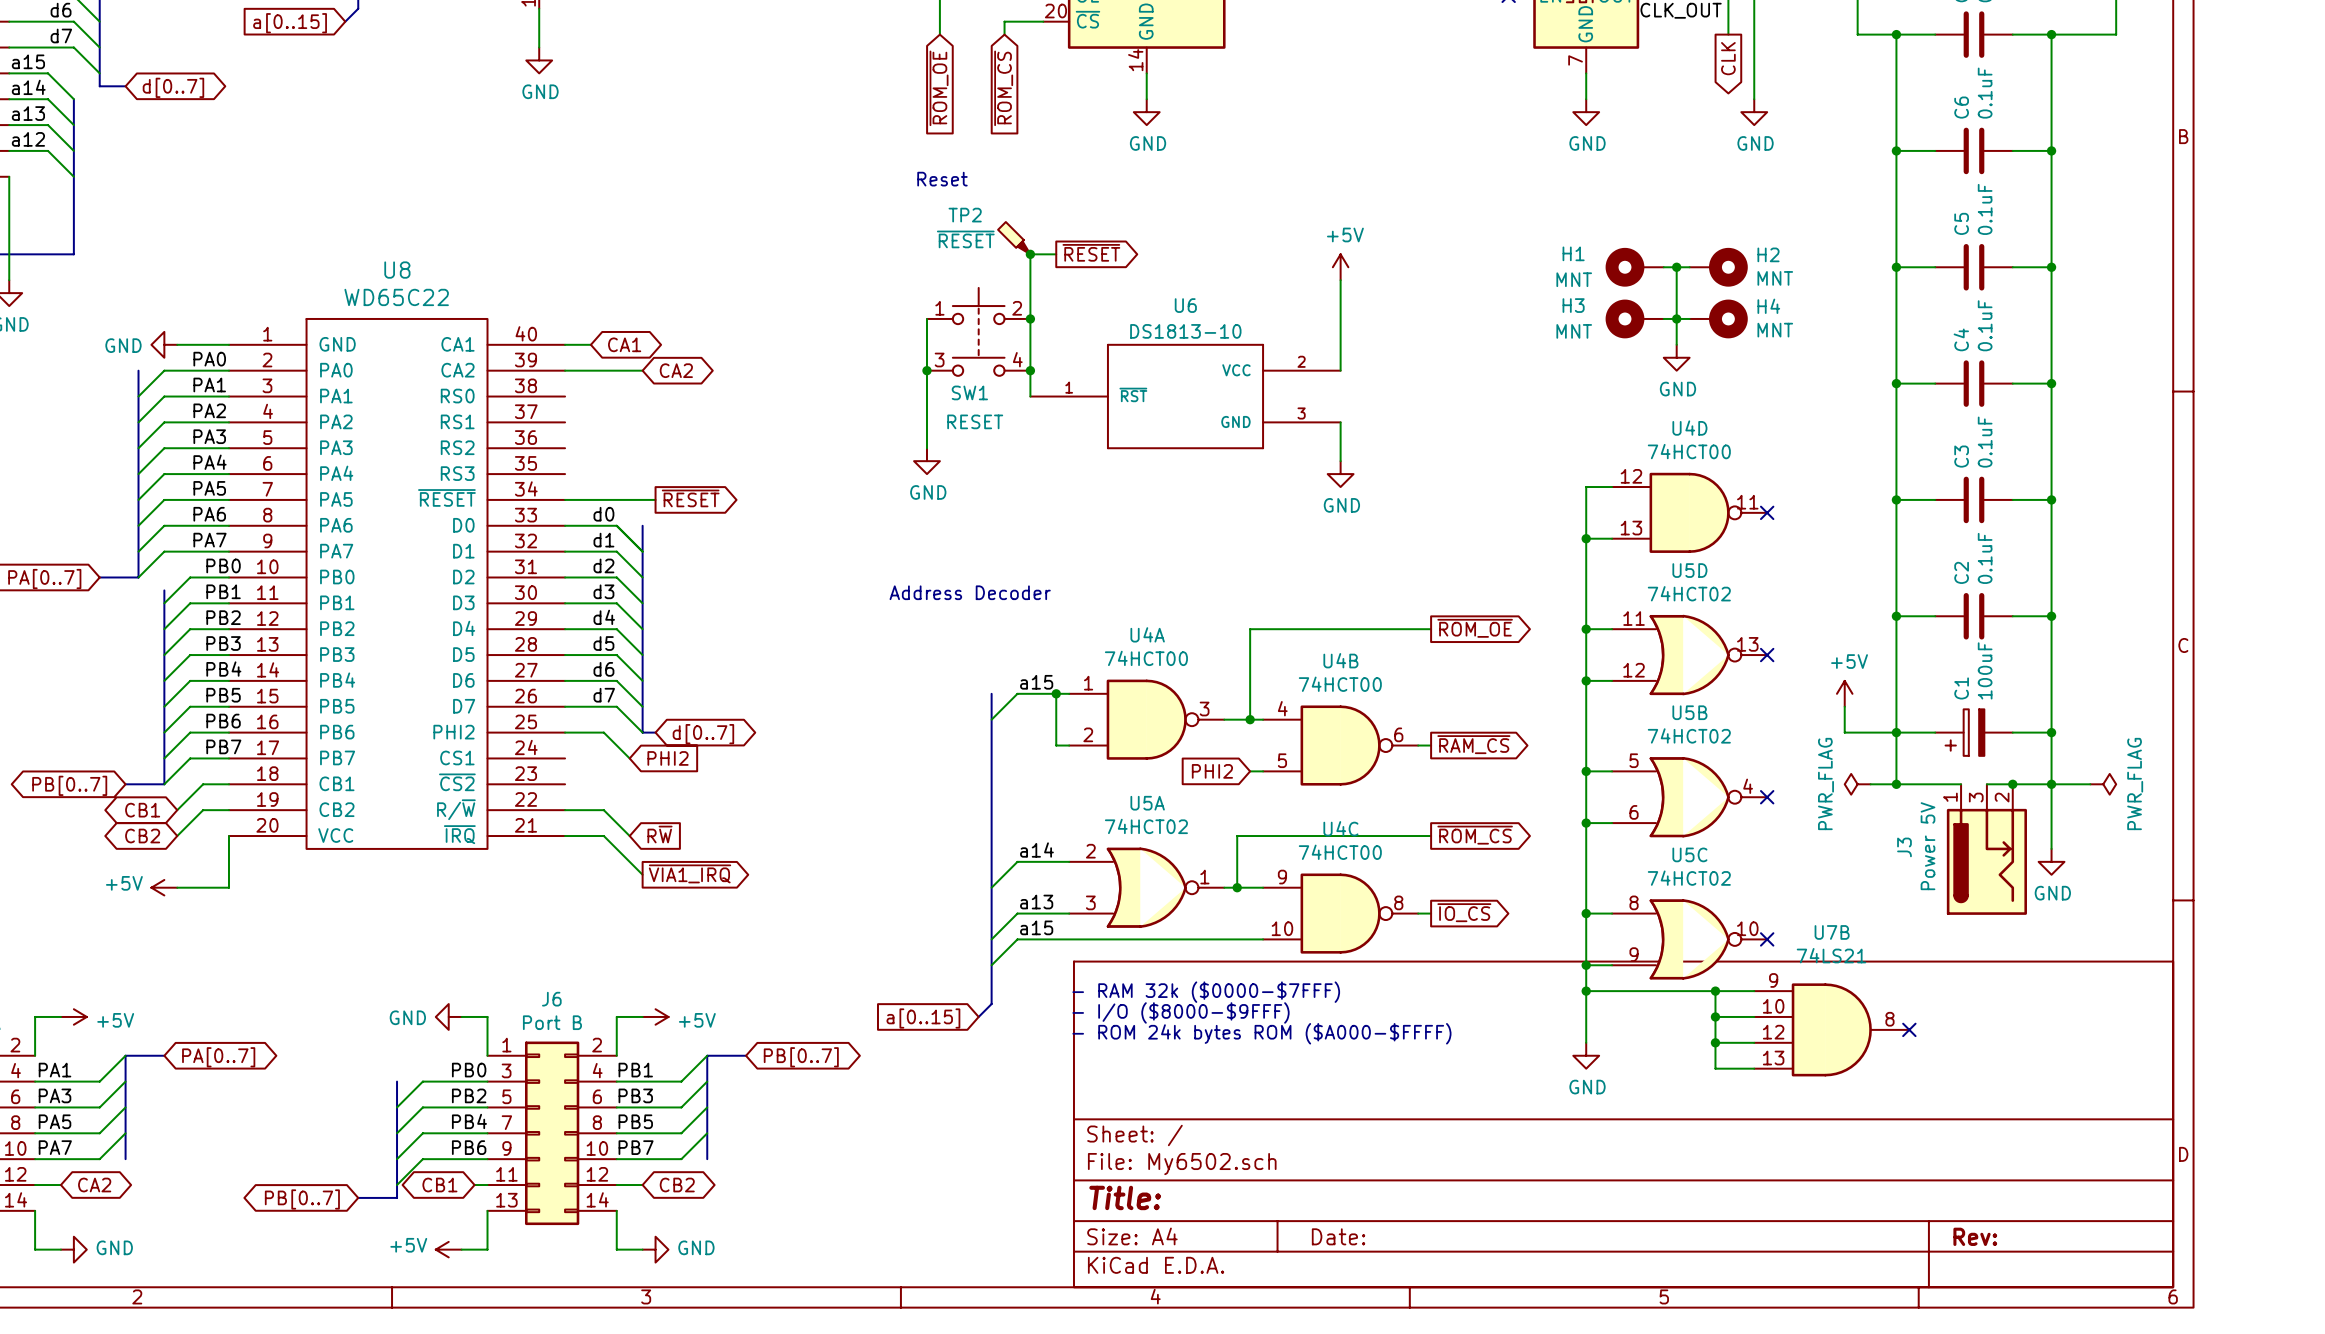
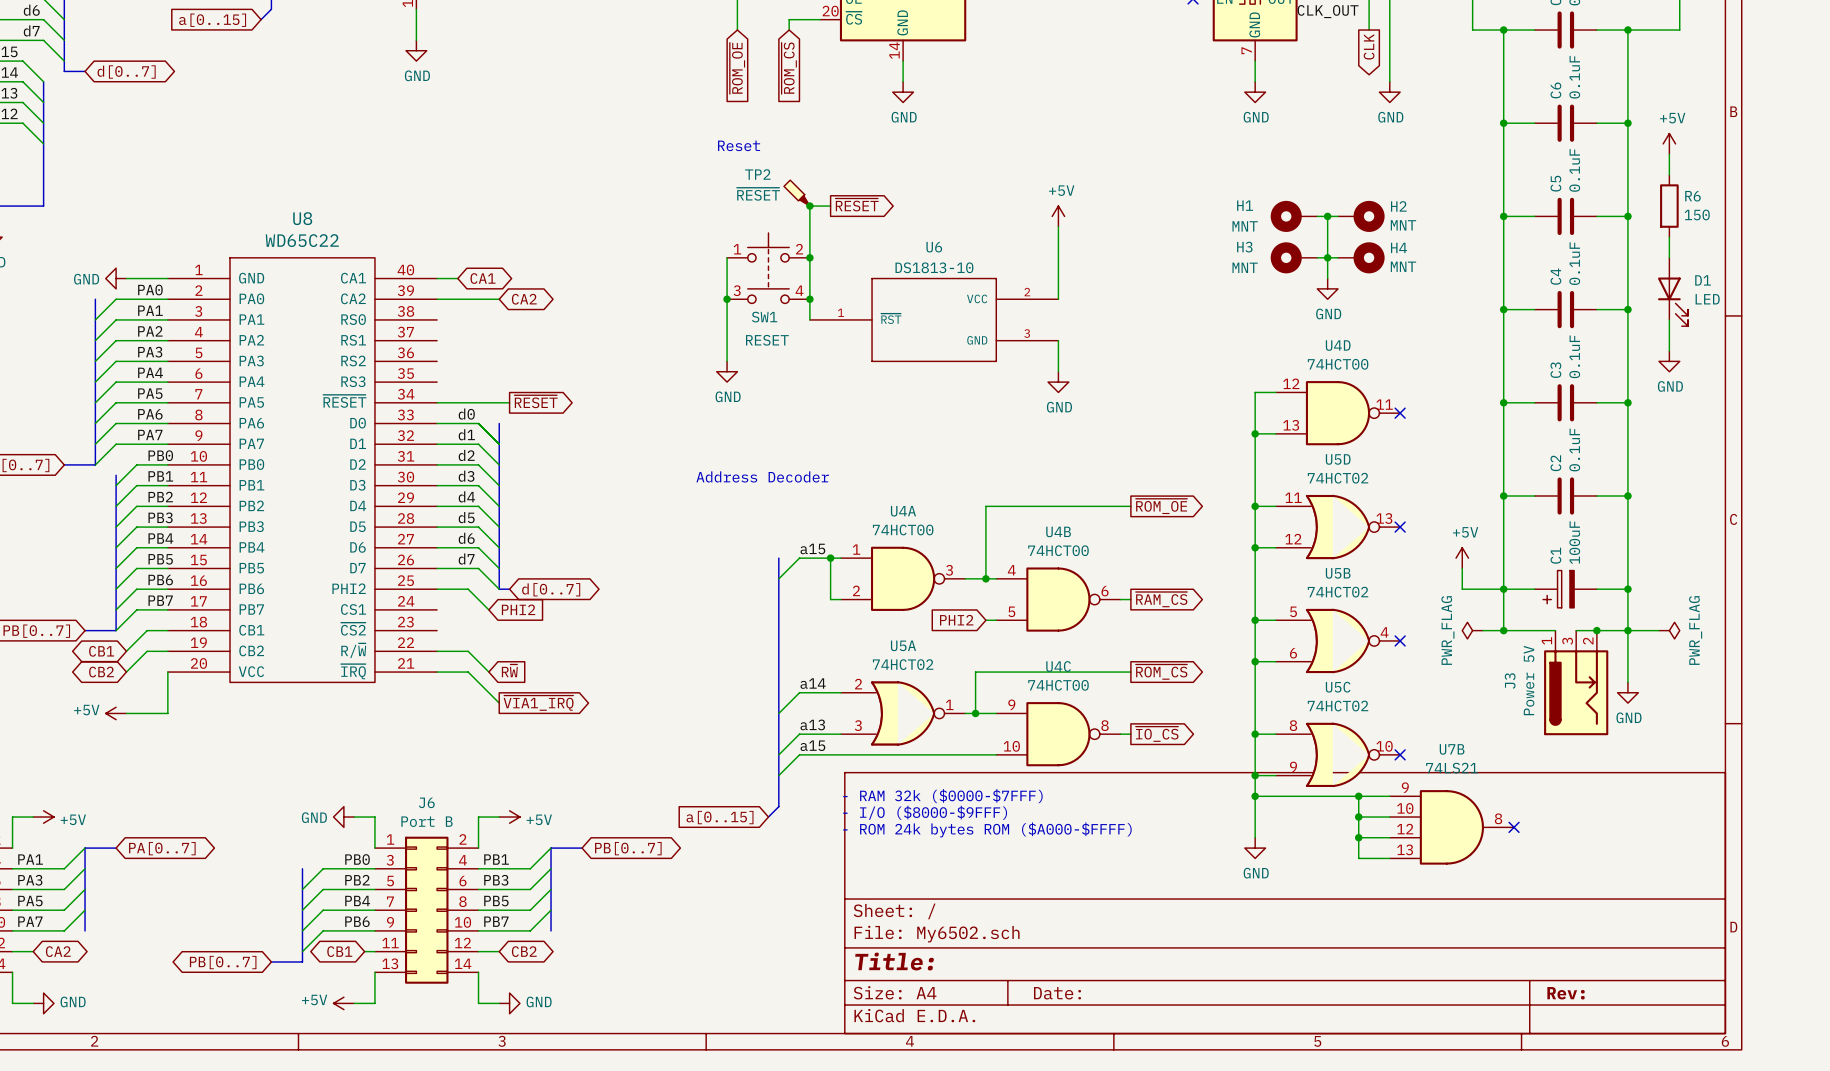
power symbol: none -> +5V (1669, 143)
wire: none -> (1669, 154) (1669, 174)
R6: none -> 150 (1669, 206)
wire: none -> (1669, 237) (1669, 257)
D1: none -> LED (1673, 292)
wire: none -> (1669, 319) (1669, 351)
power symbol: none -> GND (1669, 361)

